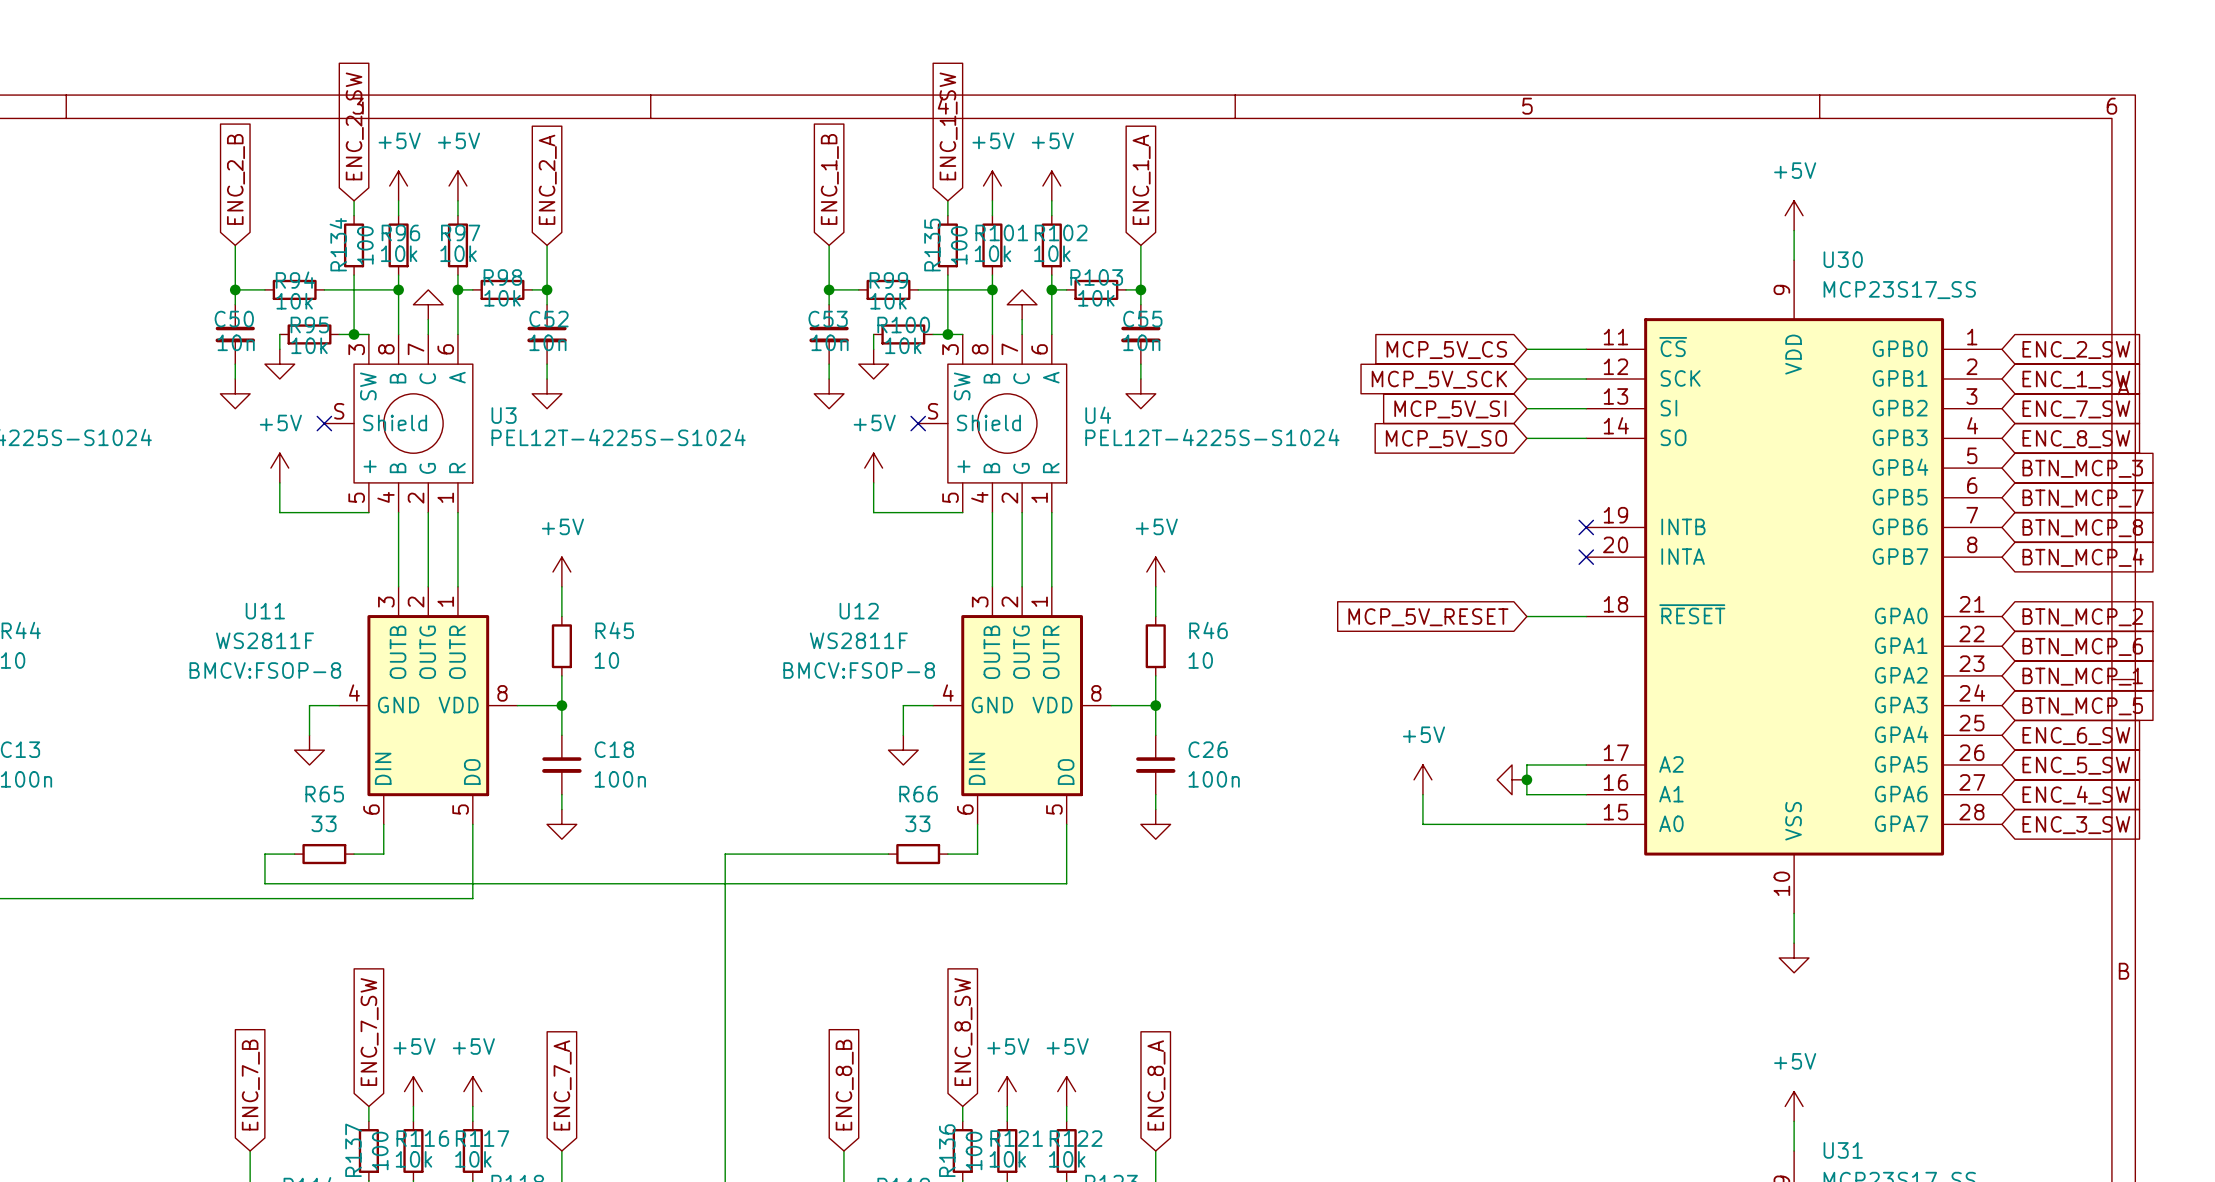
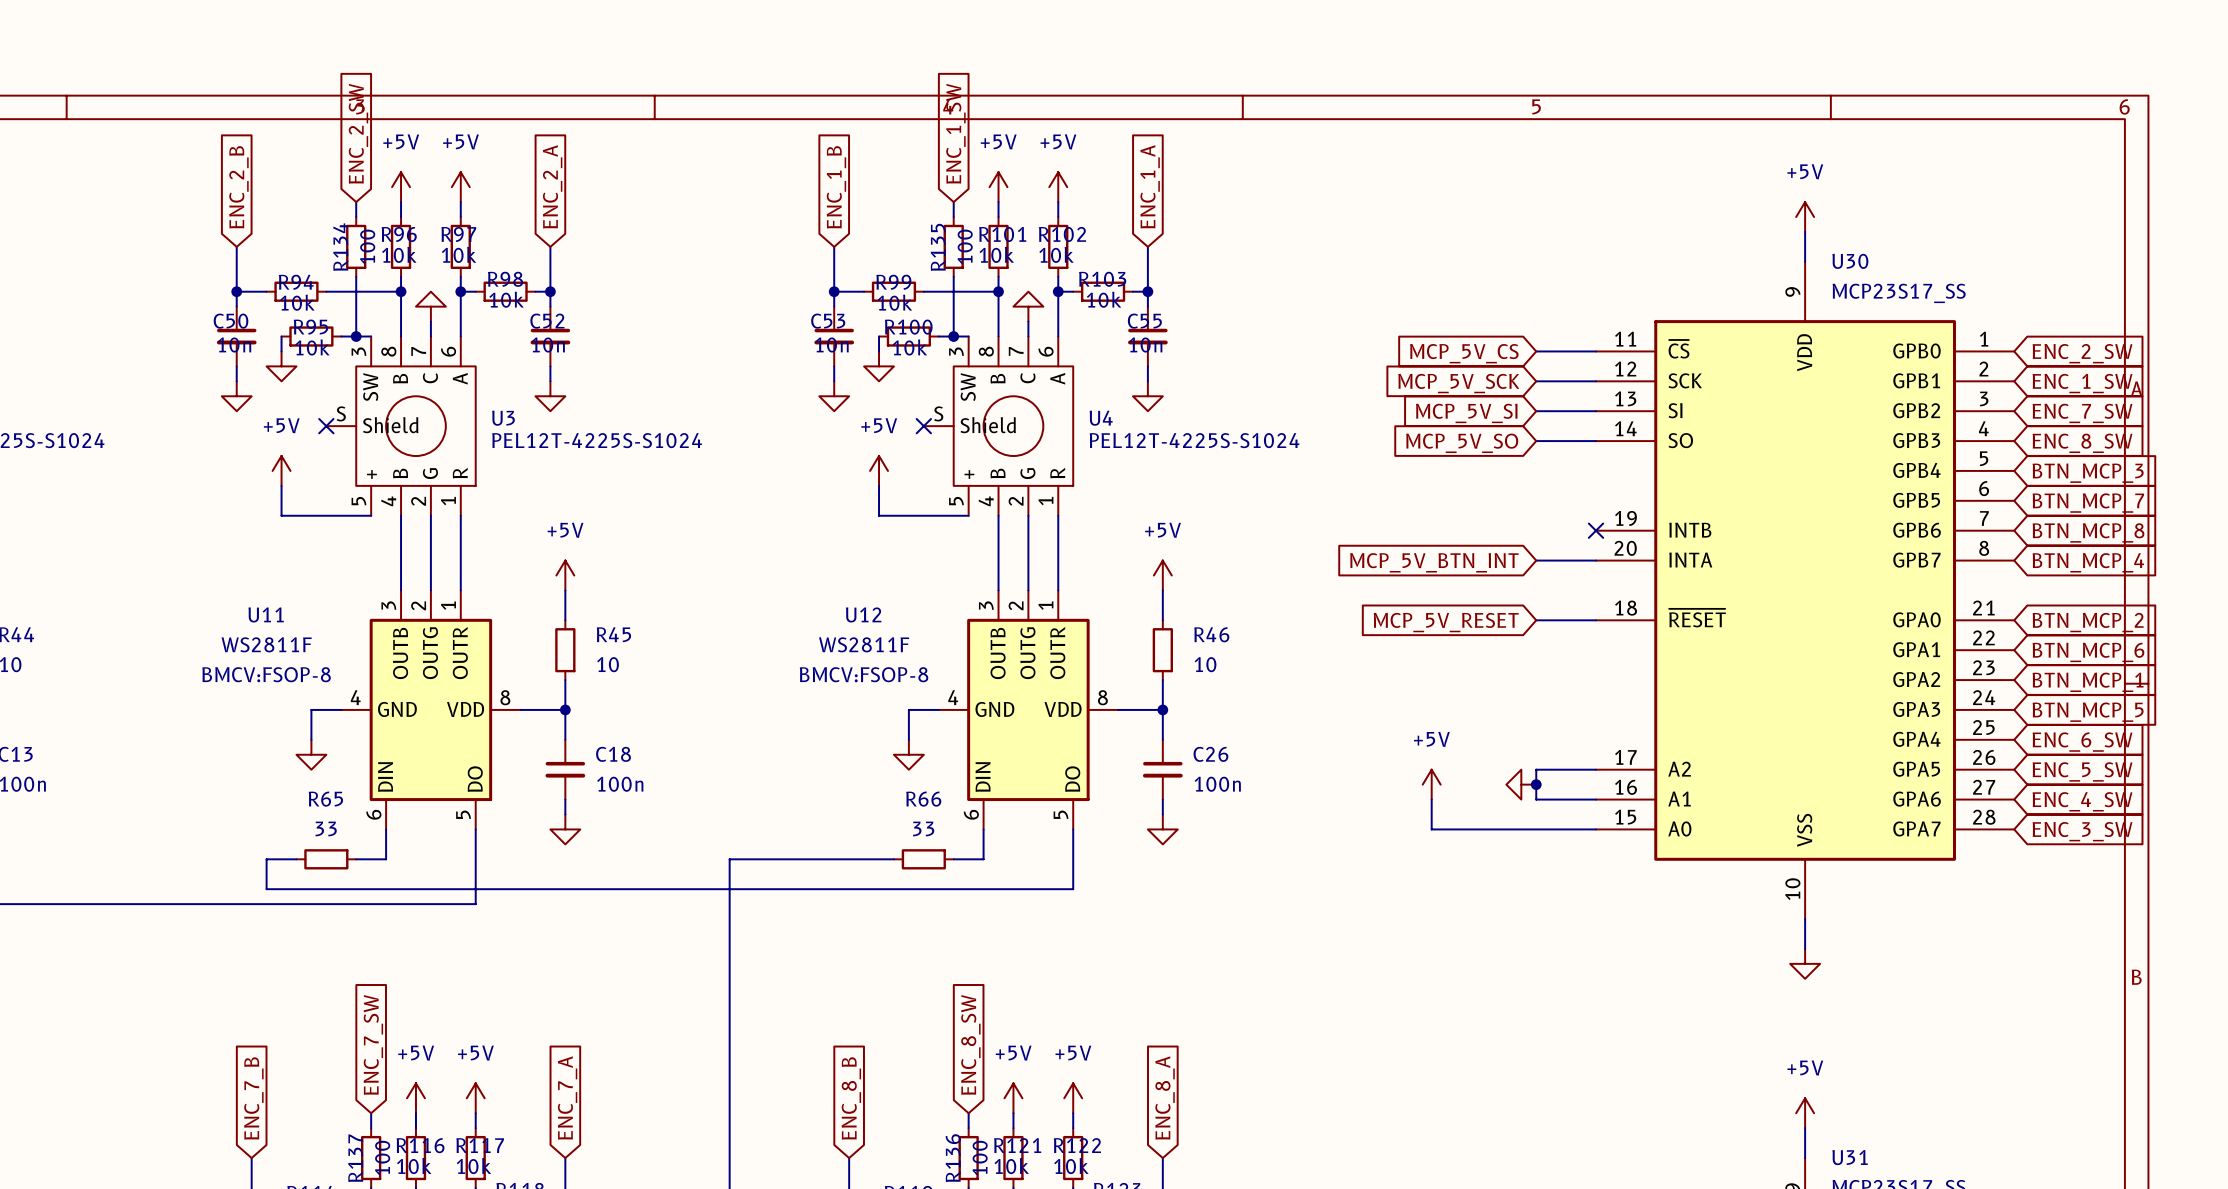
global label: none -> MCP_5V_BTN_INT (1434, 562)
wire: none -> (1536, 560) (1596, 560)
no-connect mark: (1586, 557) -> none

